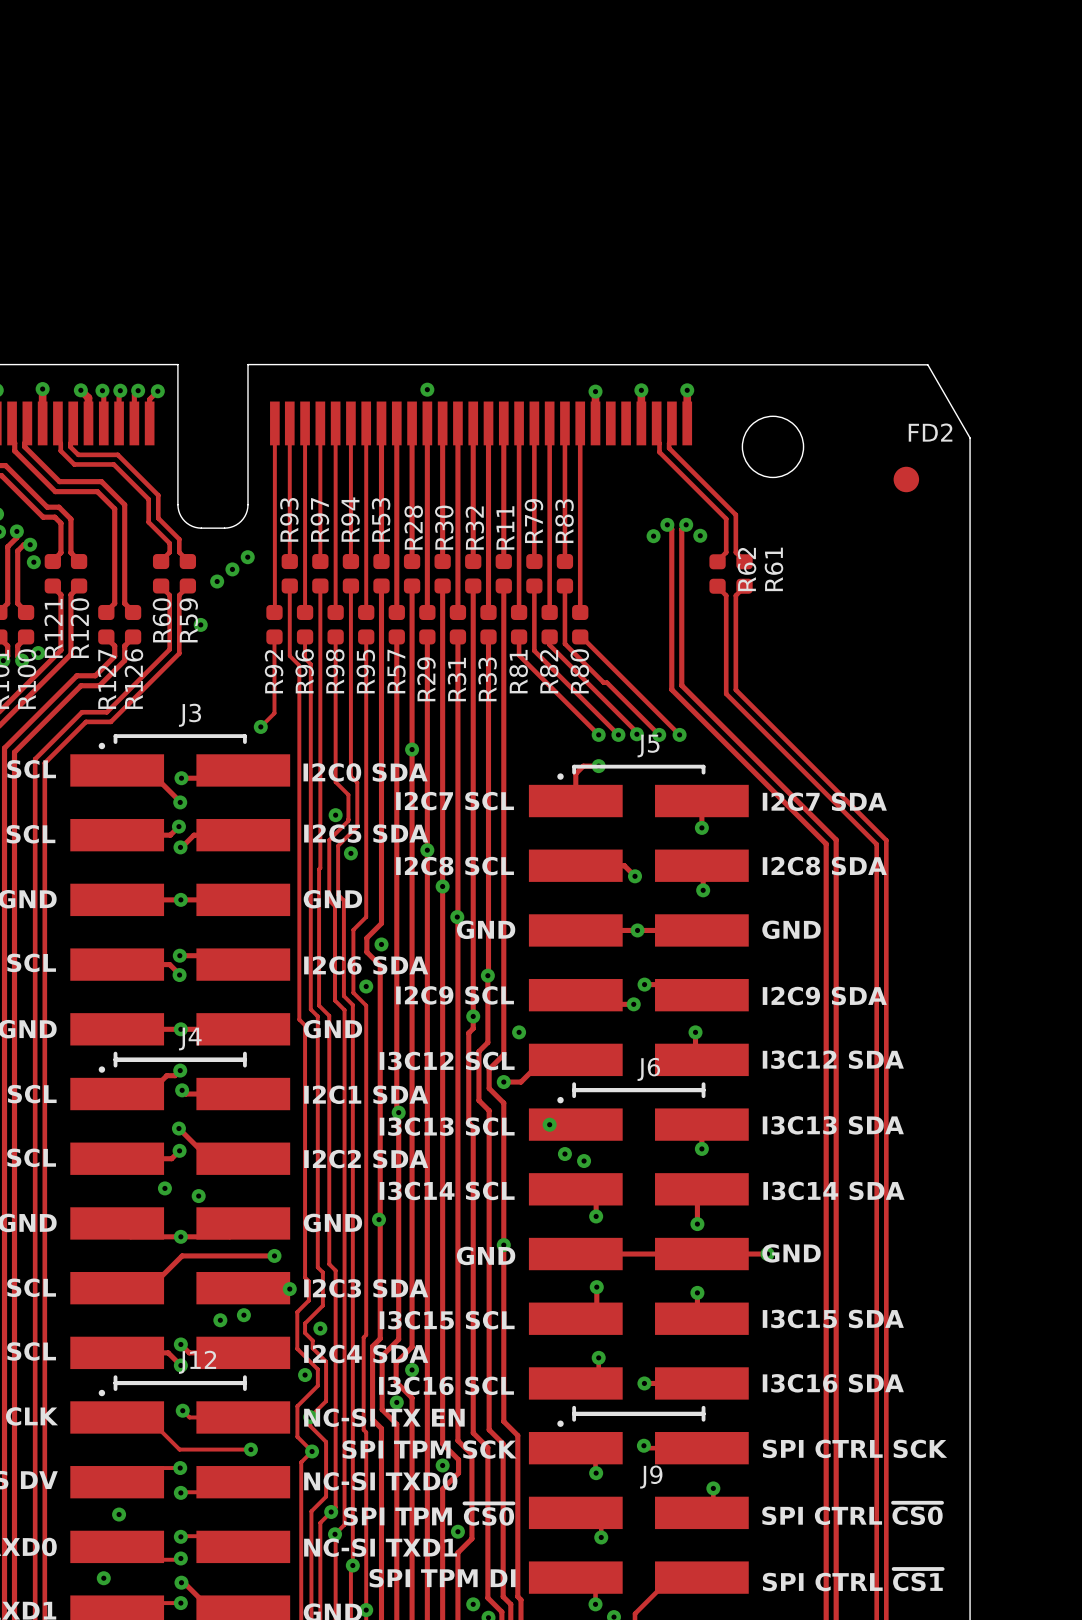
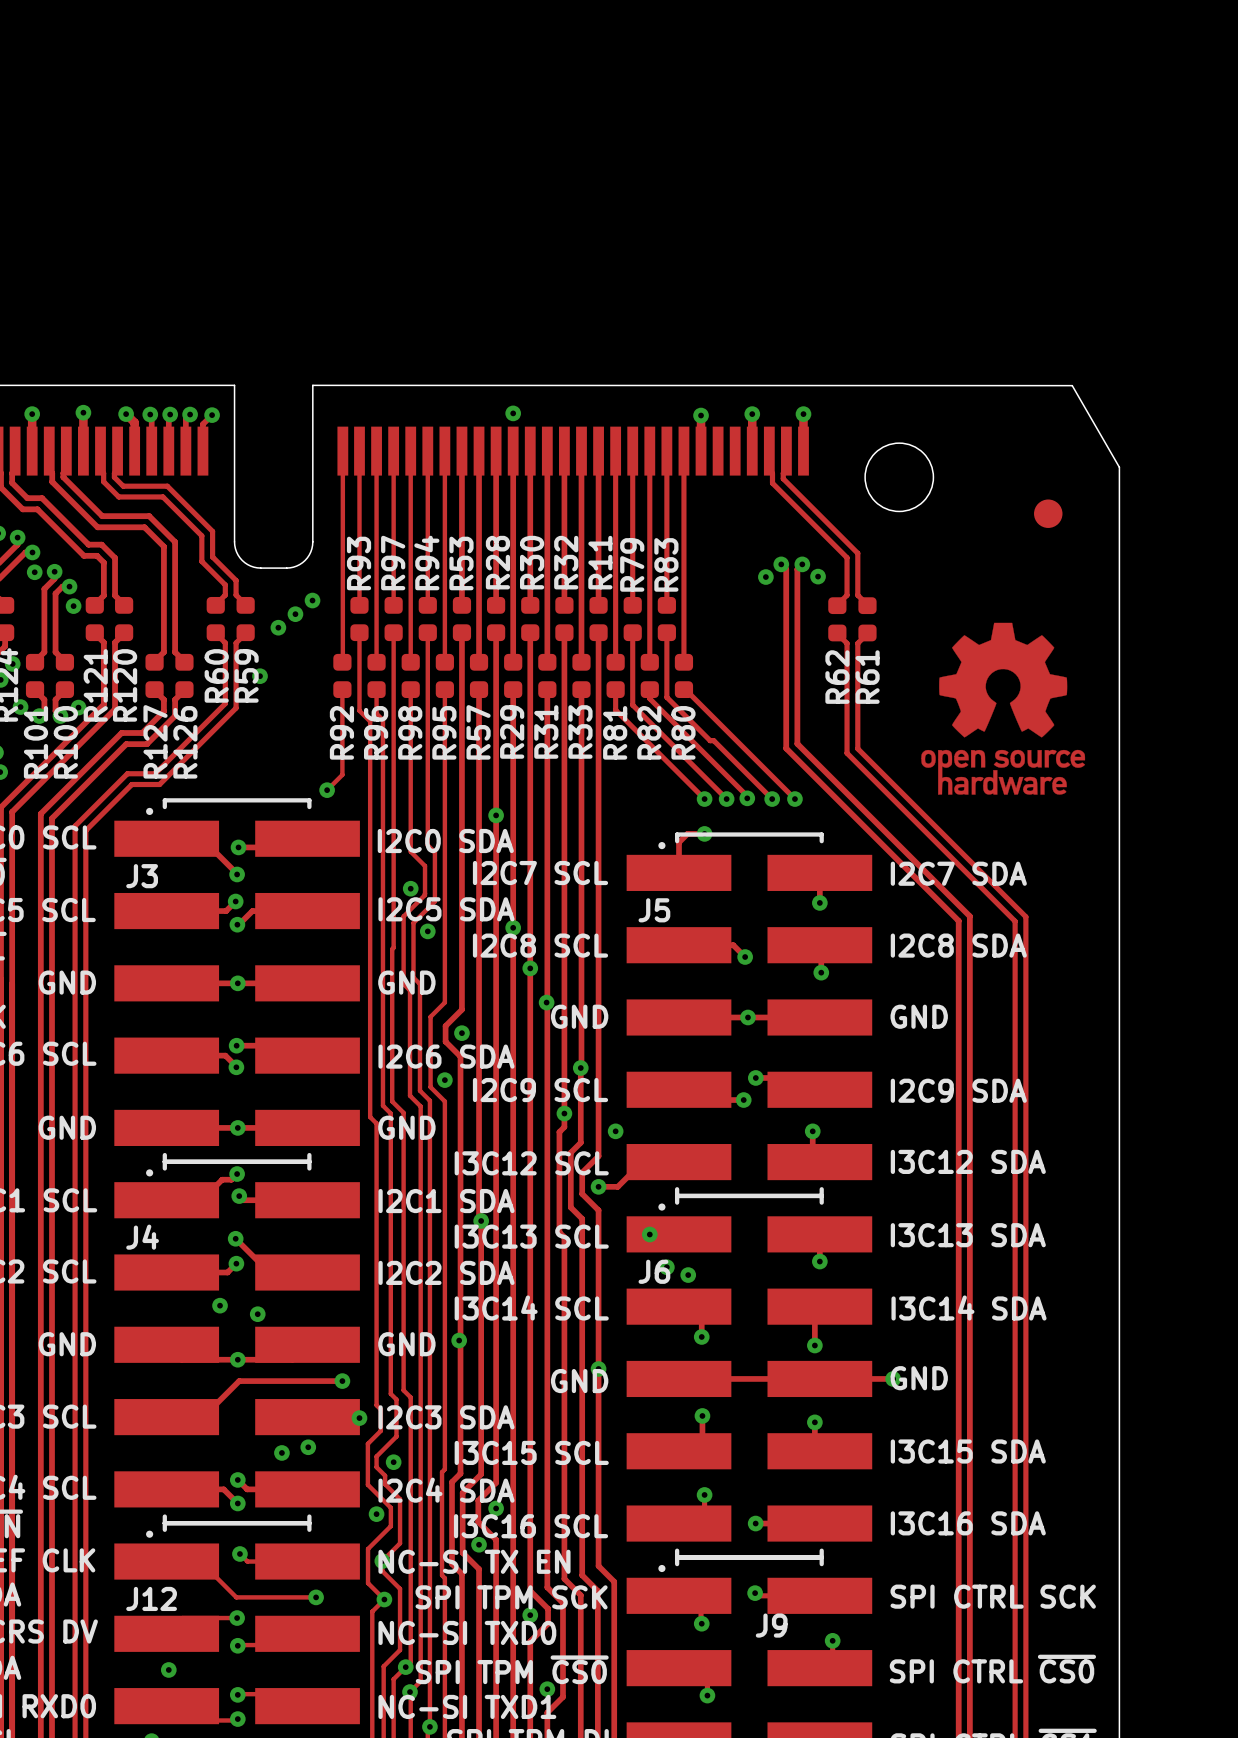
FD2 name: FD2 (930, 432) -> none
R62 name position: R62 (747, 569) -> R62 (837, 677)
R61 name position: R61 (773, 569) -> R61 (867, 677)
drawing: none -> [921, 622, 1086, 795]
J3 name position: J3 (190, 715) -> J3 (142, 876)
J5 name position: J5 (648, 746) -> J5 (654, 910)
J4 name position: J4 (190, 1039) -> J4 (142, 1237)
J6 name position: J6 (648, 1069) -> J6 (654, 1271)
J12 name position: J12 (197, 1362) -> J12 (151, 1598)

